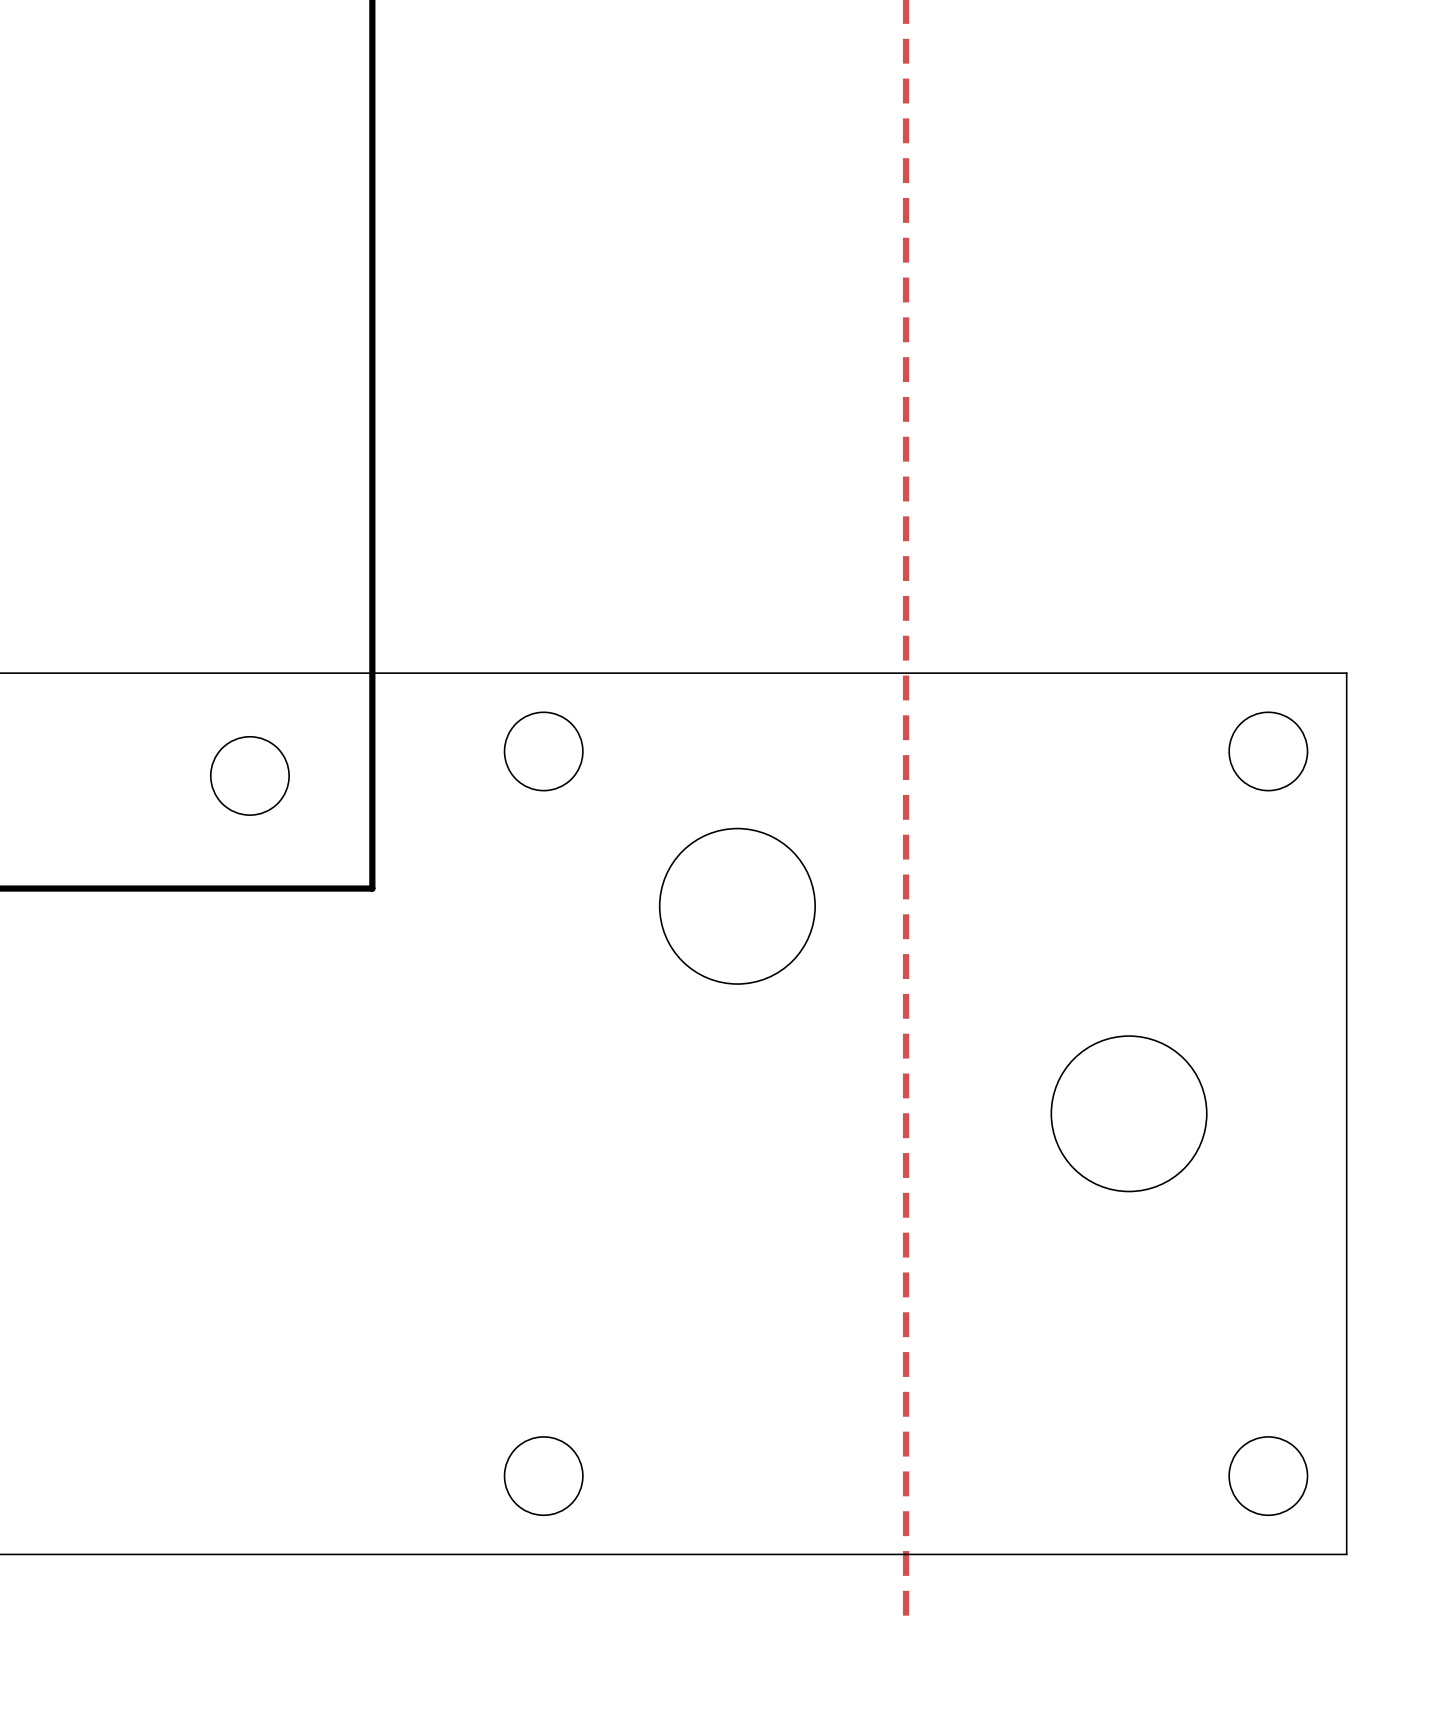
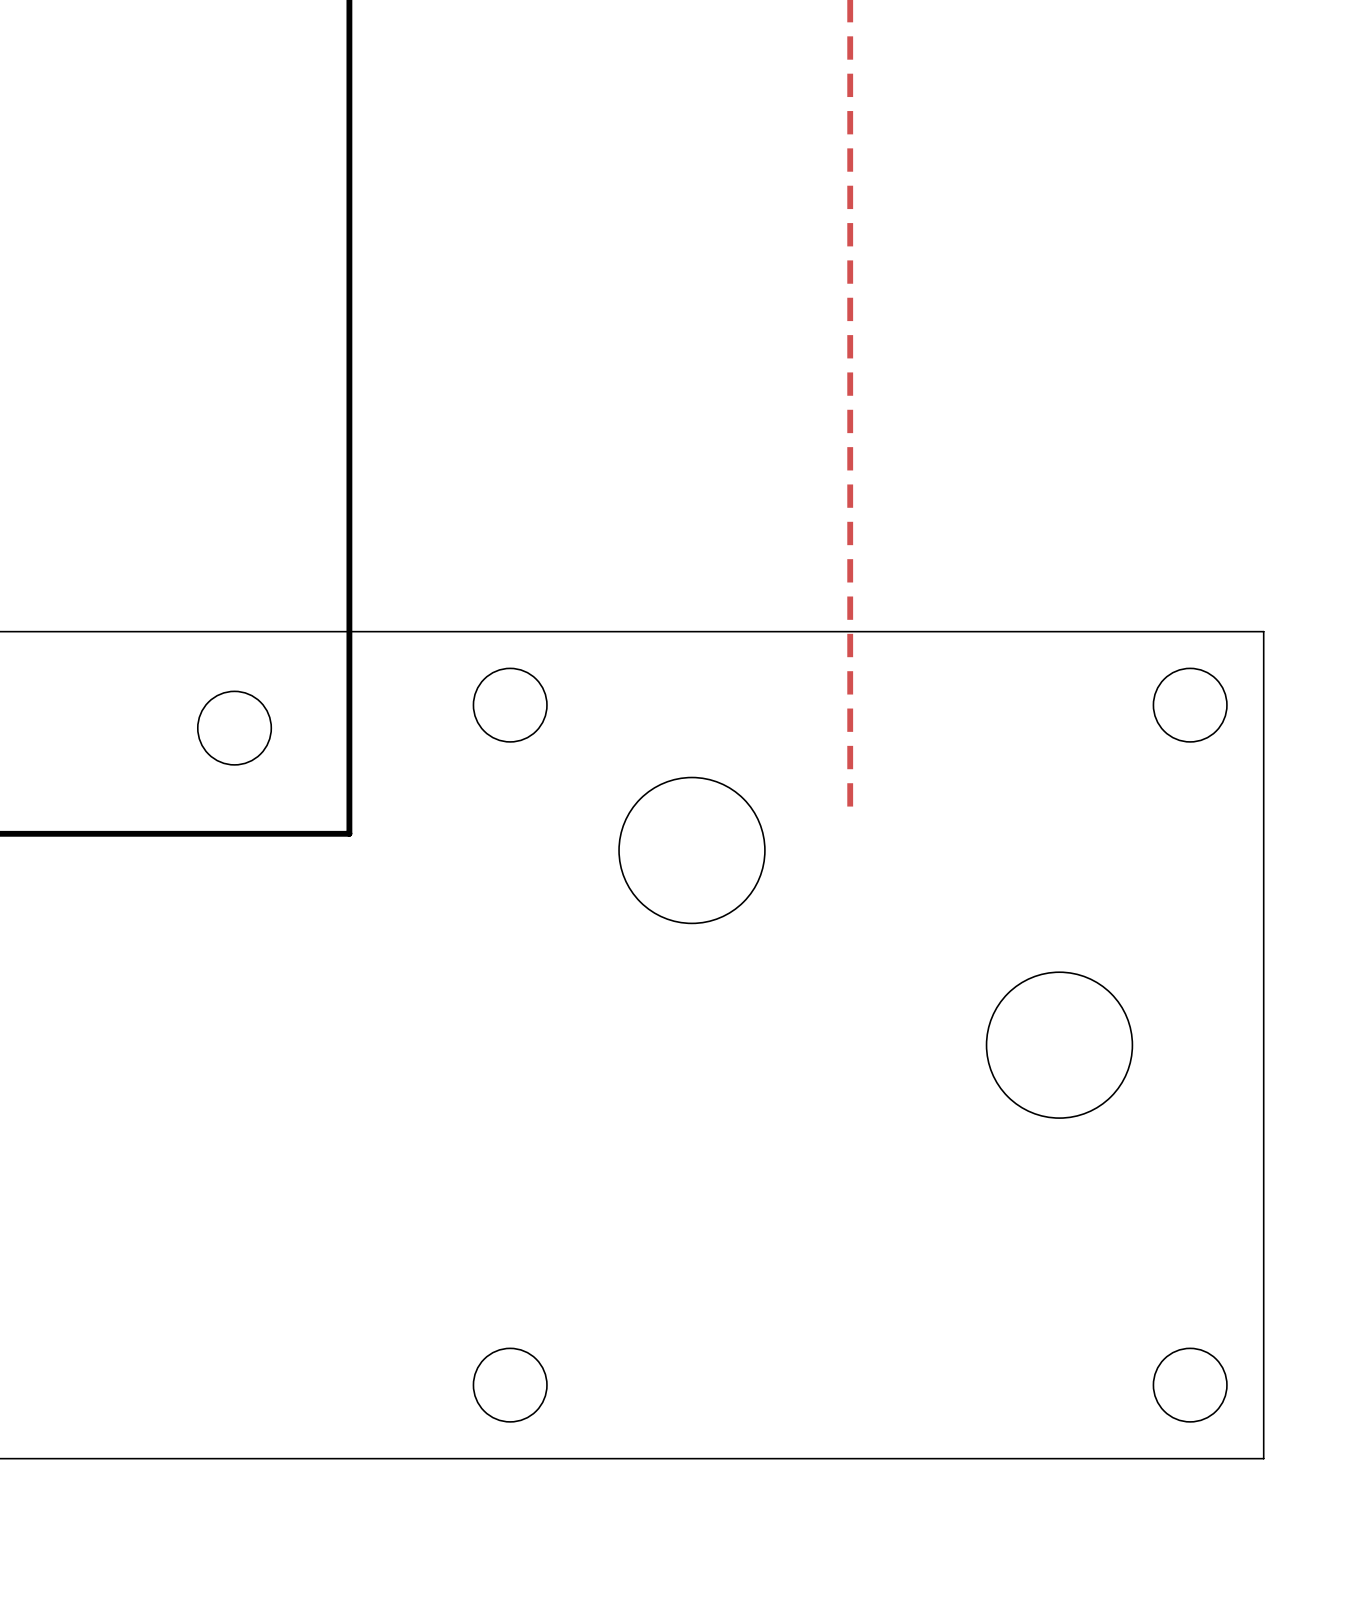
top track: (906, 870) (906, 1616) -> none

